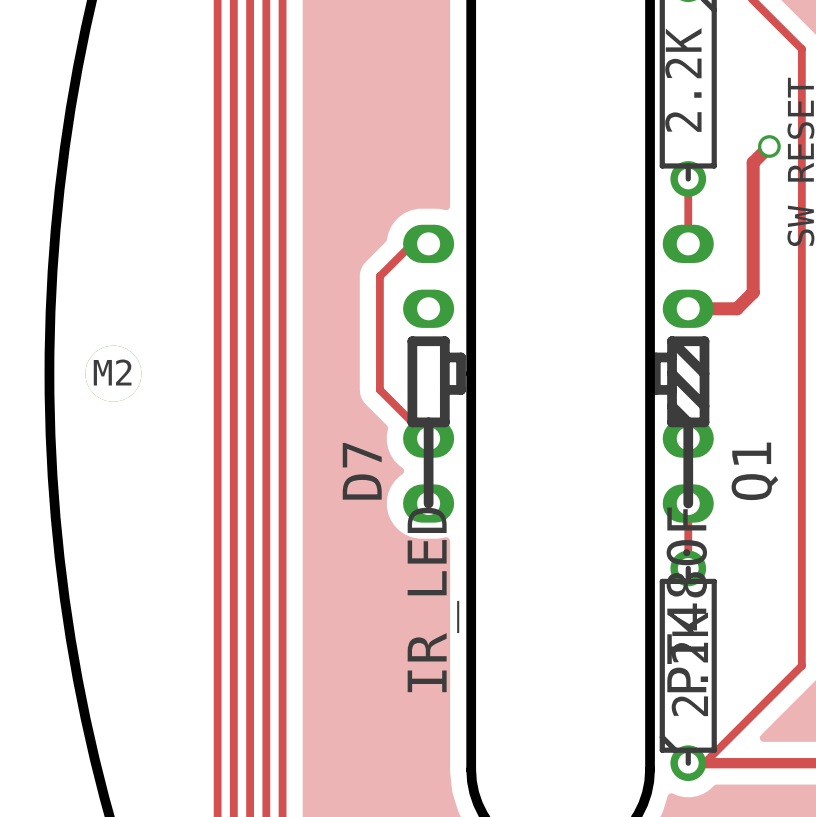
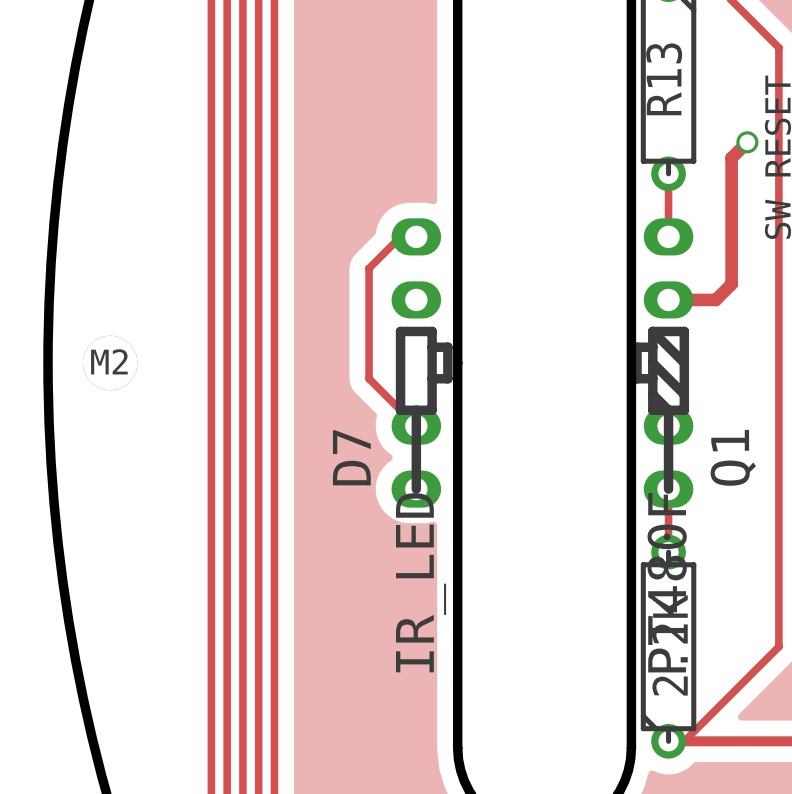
R13 value: 2.2K (683, 80) -> none
R13 name: none -> R13 (664, 79)

